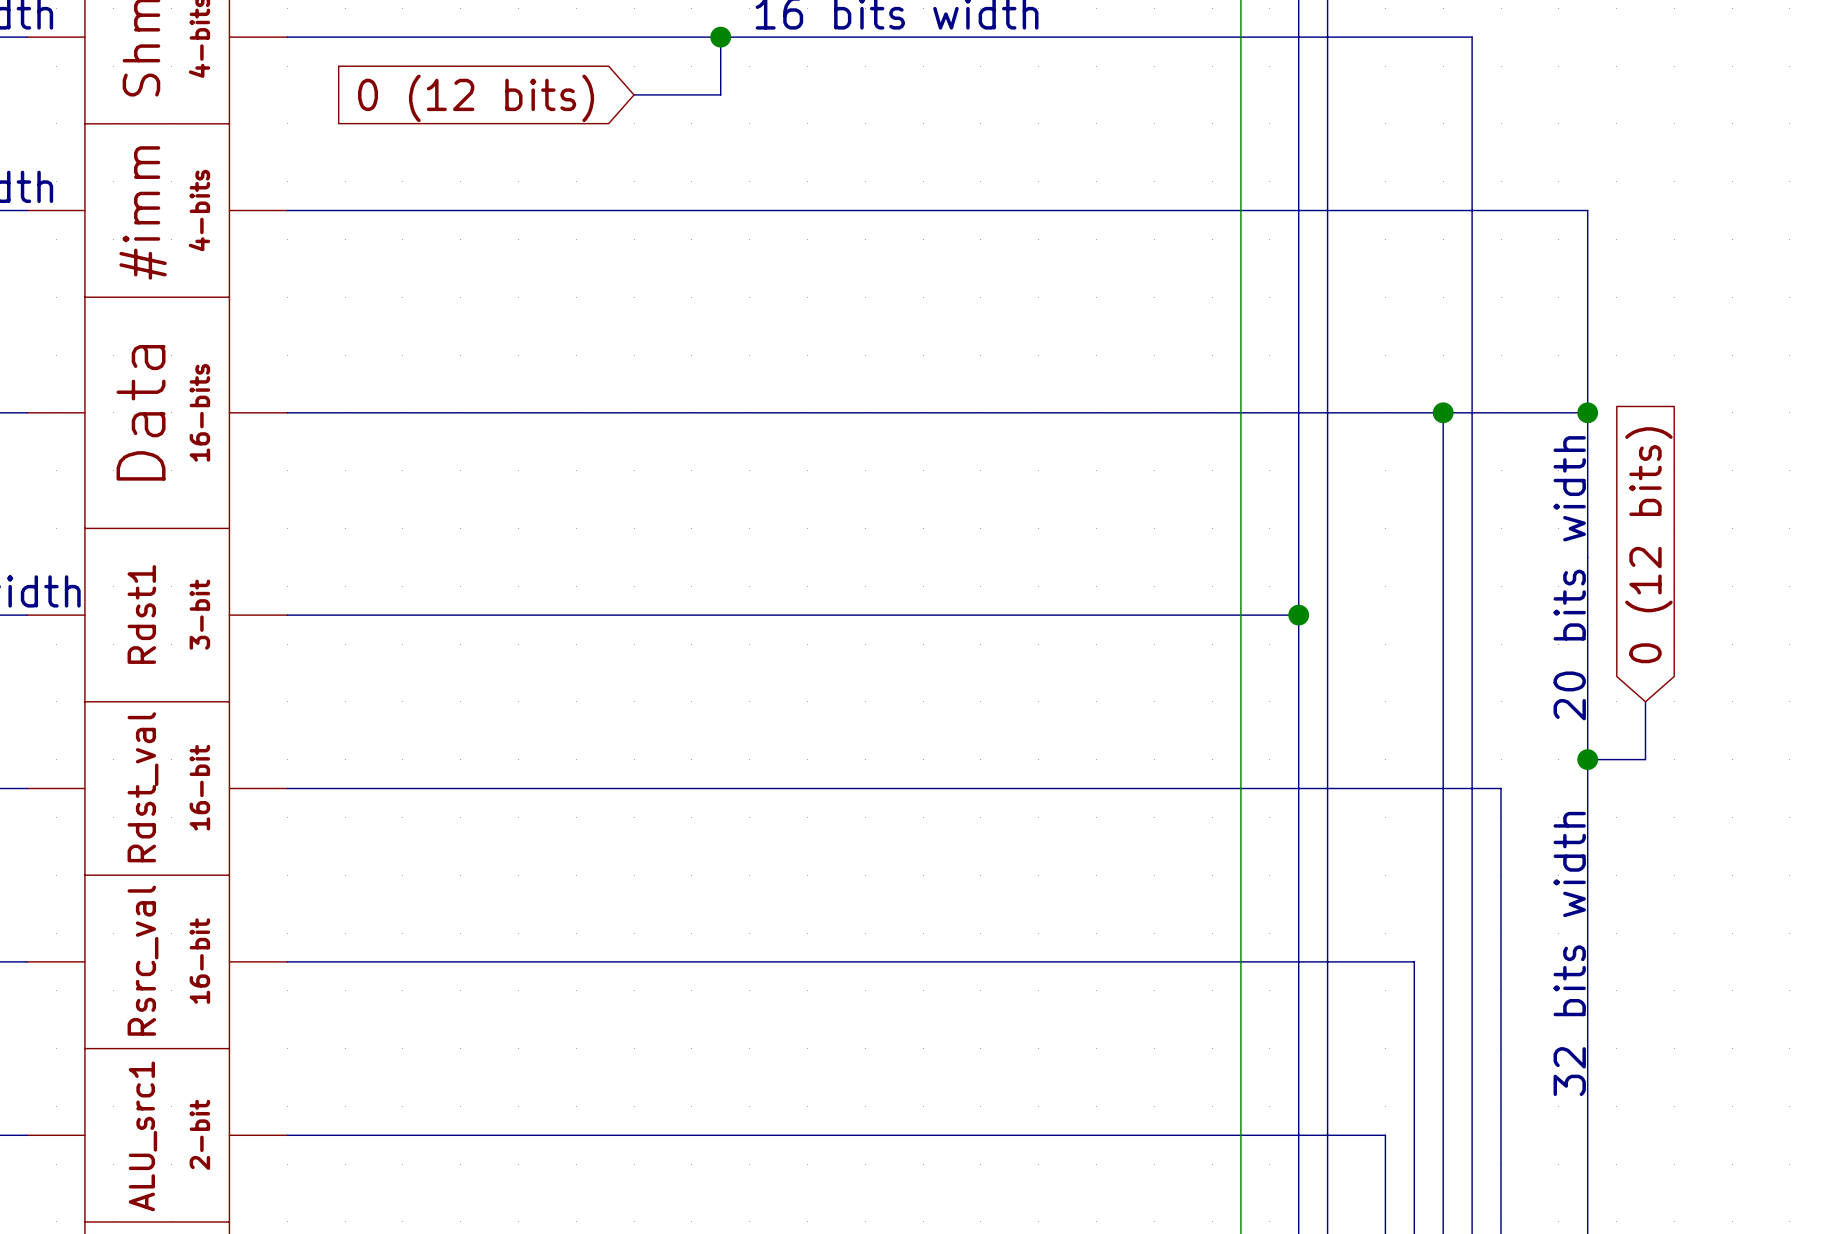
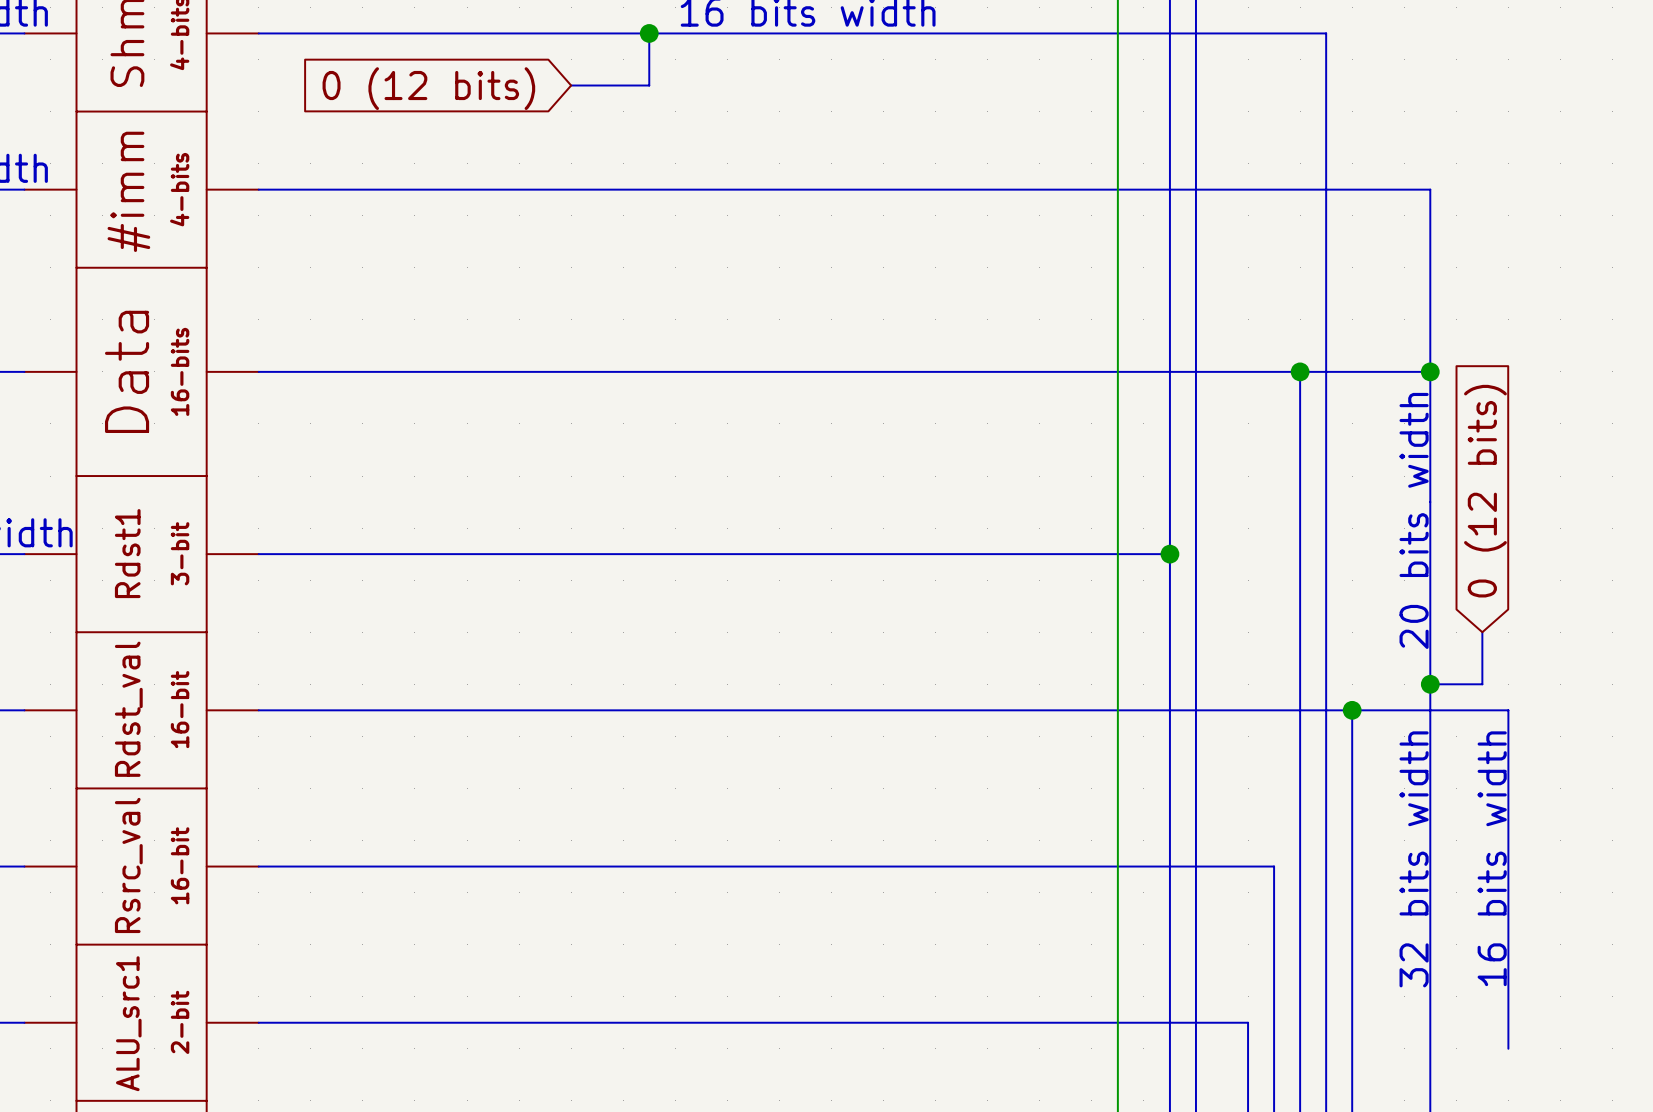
bus: none -> (1352, 710) (1508, 710) (1508, 1048)
junction: none -> (1352, 710)
text: none -> 16 bits width (1492, 858)

